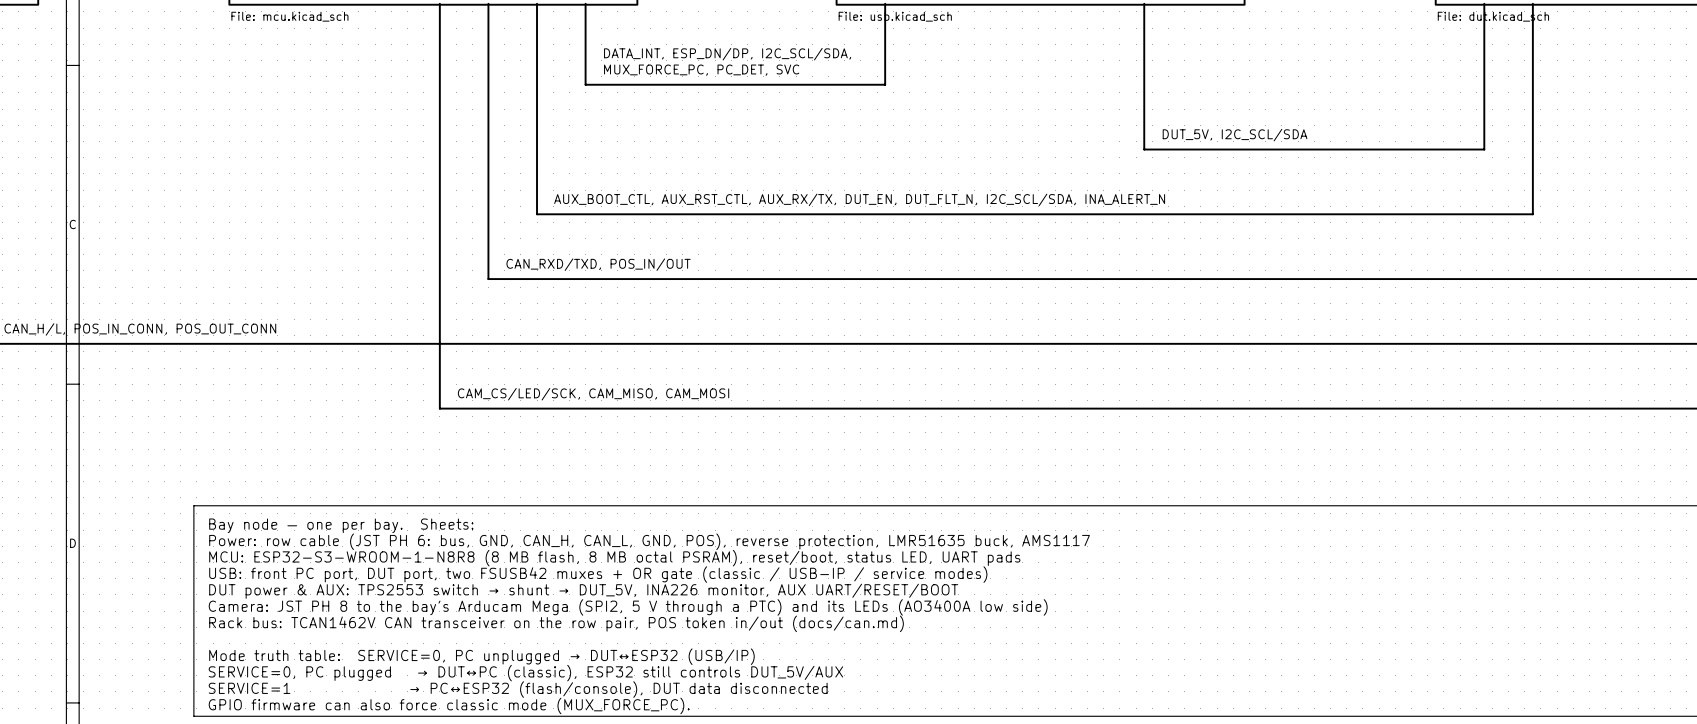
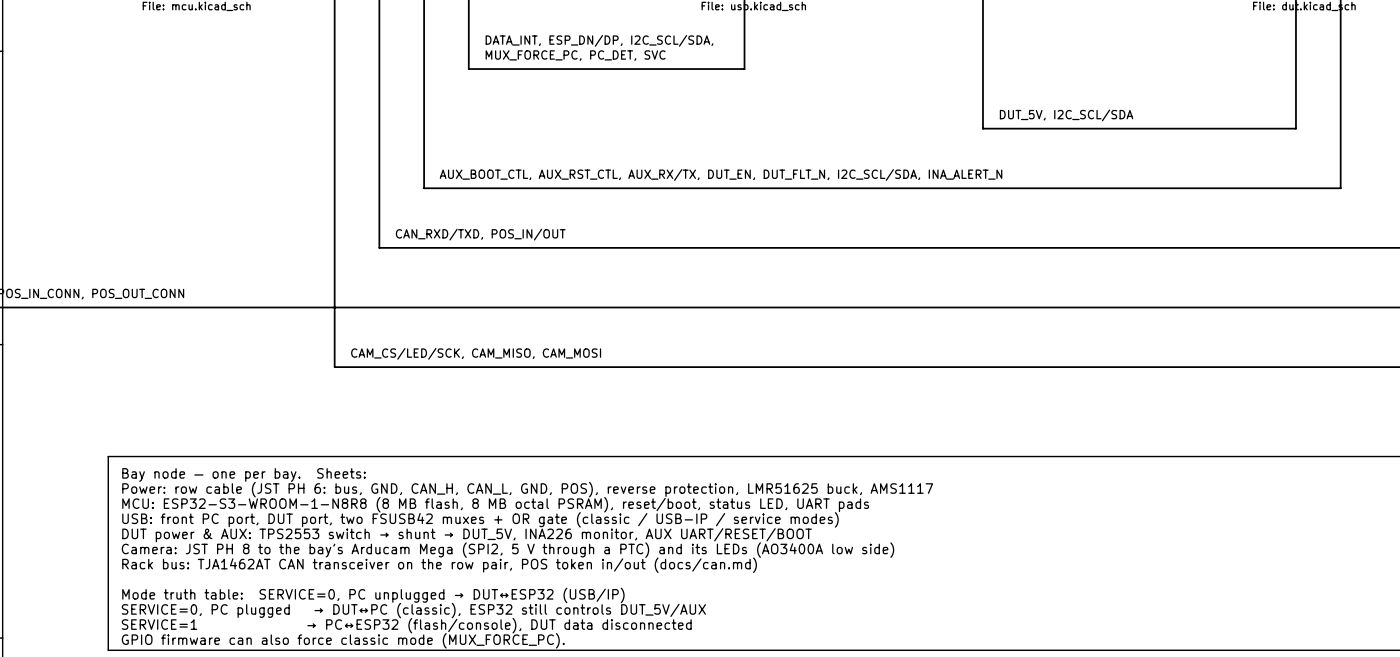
text: Power: row cable (JST PH 6: bus, GND, CAN_H, CAN_L, GND, POS), reverse protection, LMR51635 buck, AMS1117 (649, 541) -> Power: row cable (JST PH 6: bus, GND, CAN_H, CAN_L, GND, POS), reverse protection, LMR51625 buck, AMS1117 (527, 489)
text: Rack bus: TCAN1462V CAN transceiver on the row pair, POS token in/out (docs/can.md) (556, 623) -> Rack bus: TJA1462AT CAN transceiver on the row pair, POS token in/out (docs/can.md) (439, 565)

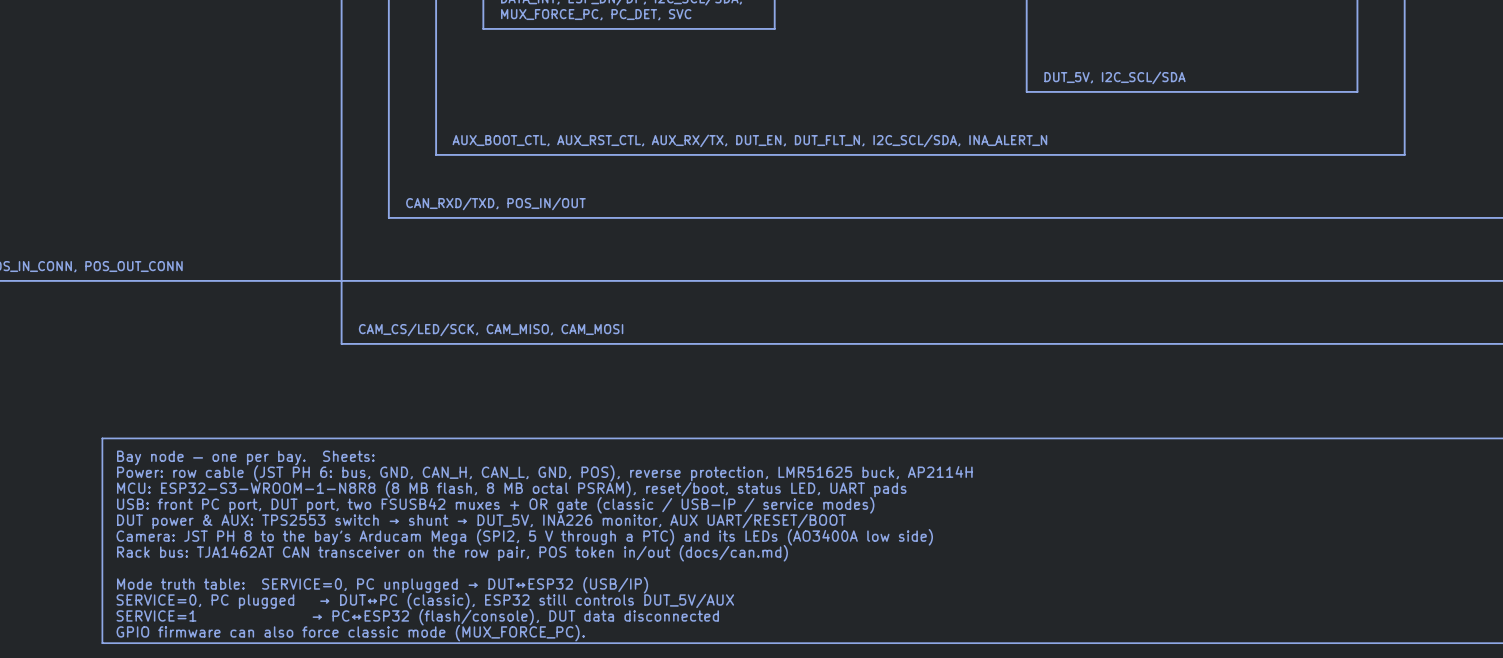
text: Power: row cable (JST PH 6: bus, GND, CAN_H, CAN_L, GND, POS), reverse protection, LMR51625 buck, AMS1117 (527, 489) -> Power: row cable (JST PH 6: bus, GND, CAN_H, CAN_L, GND, POS), reverse protection, LMR51625 buck, AP2114H (544, 473)

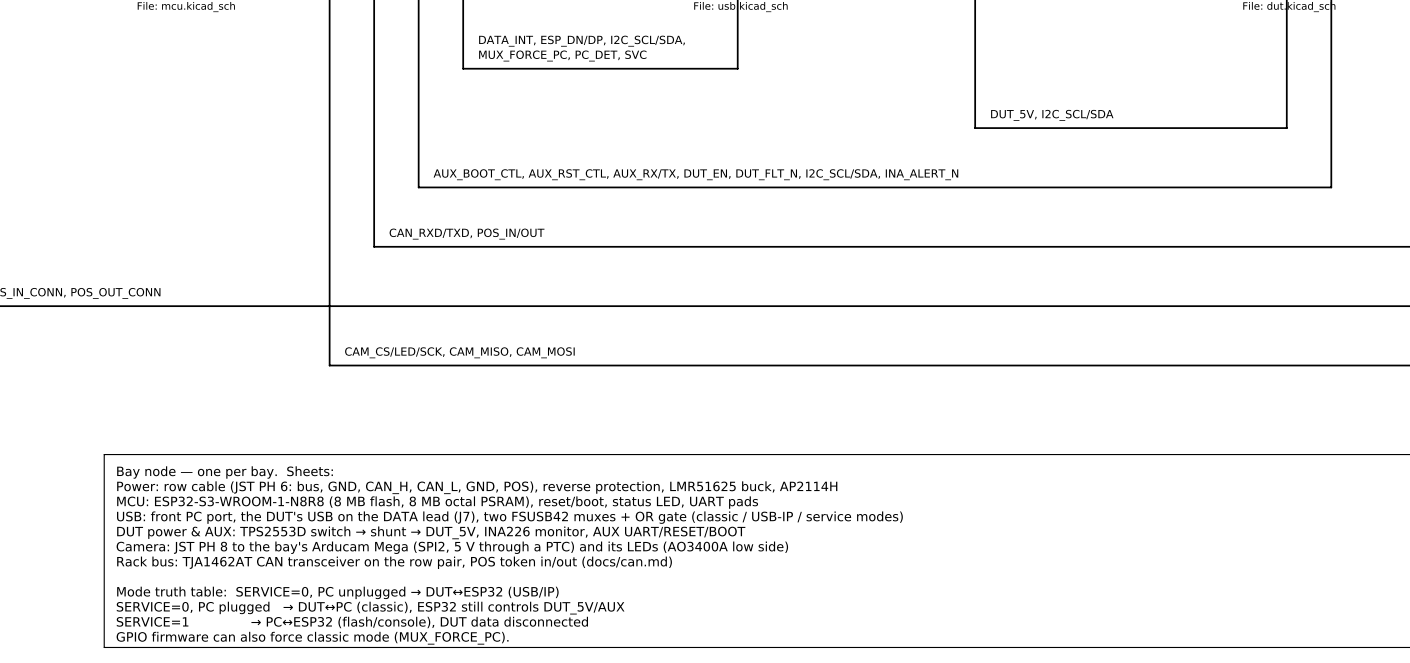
text: USB: front PC port, DUT port, two FSUSB42 muxes + OR gate (classic / USB-IP / service modes) (495, 505) -> USB: front PC port, the DUT's USB on the DATA lead (J7), two FSUSB42 muxes + OR gate (classic / USB-IP / service modes) (509, 517)
text: DUT power & AUX: TPS2553 switch → shunt → DUT_5V, INA226 monitor, AUX UART/RESET/BOOT (481, 521) -> DUT power & AUX: TPS2553D switch → shunt → DUT_5V, INA226 monitor, AUX UART/RESET/BOOT (431, 532)

